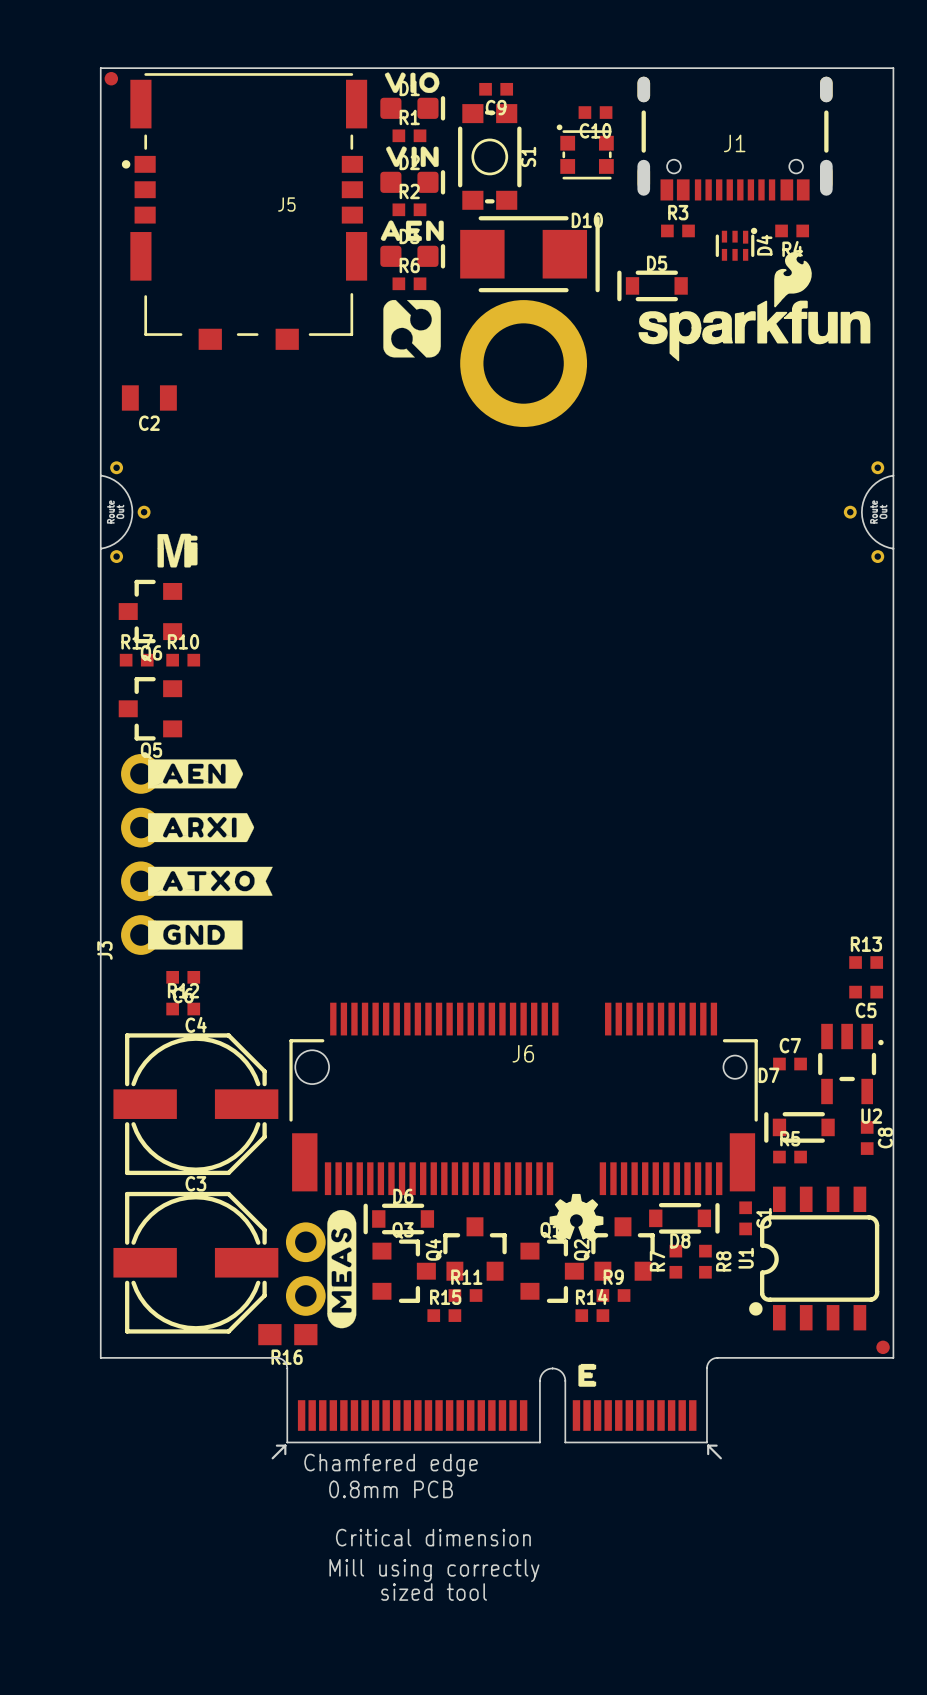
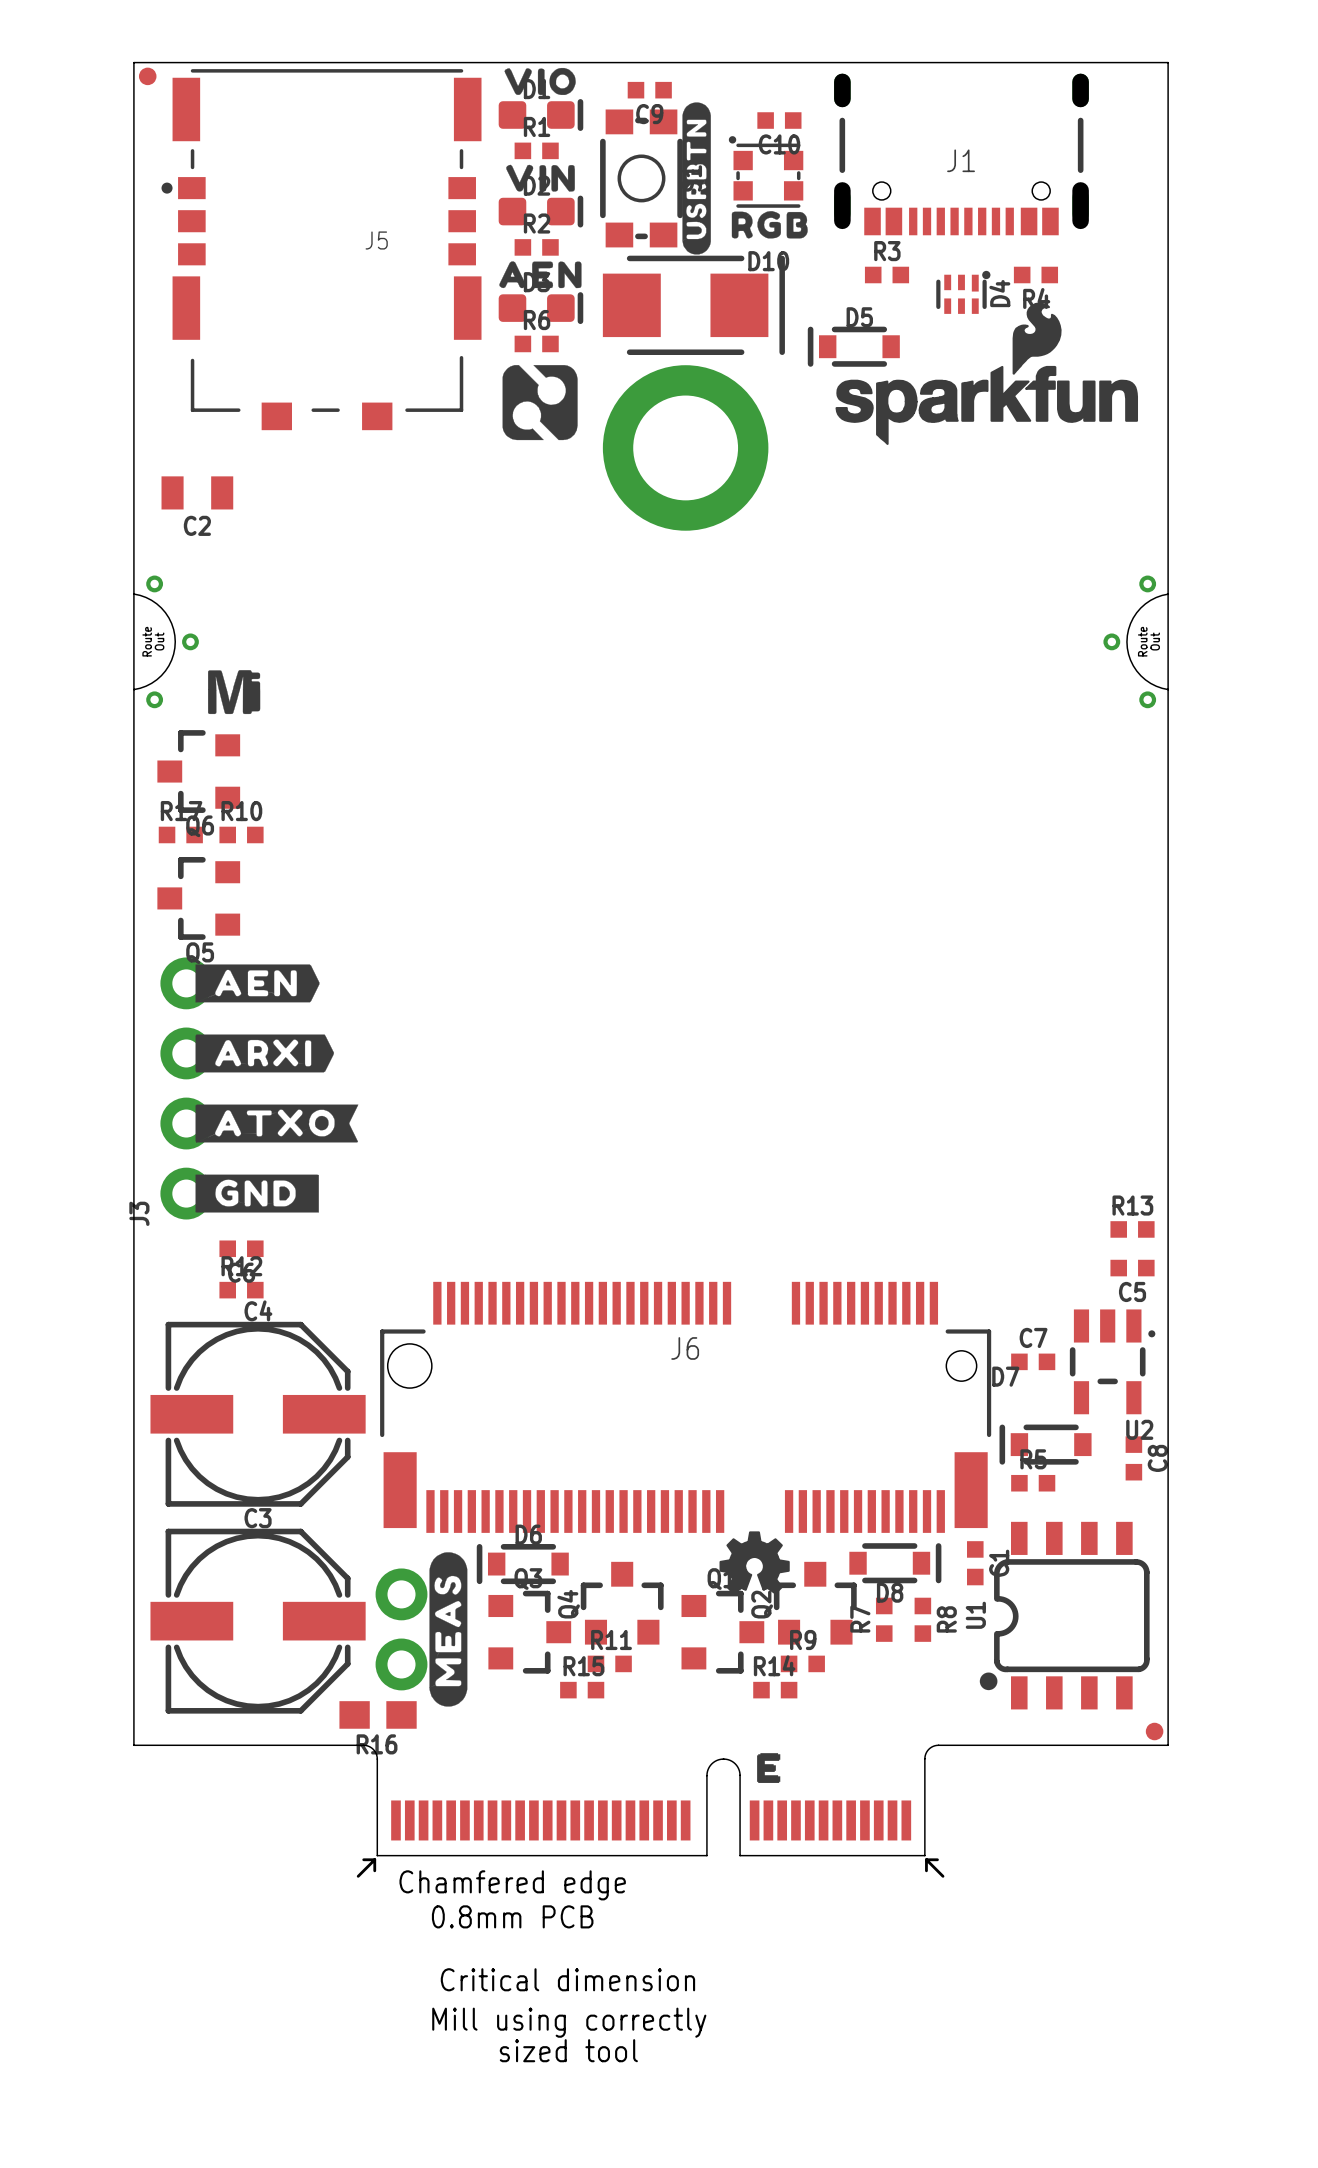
drawing: none -> [682, 102, 808, 255]

